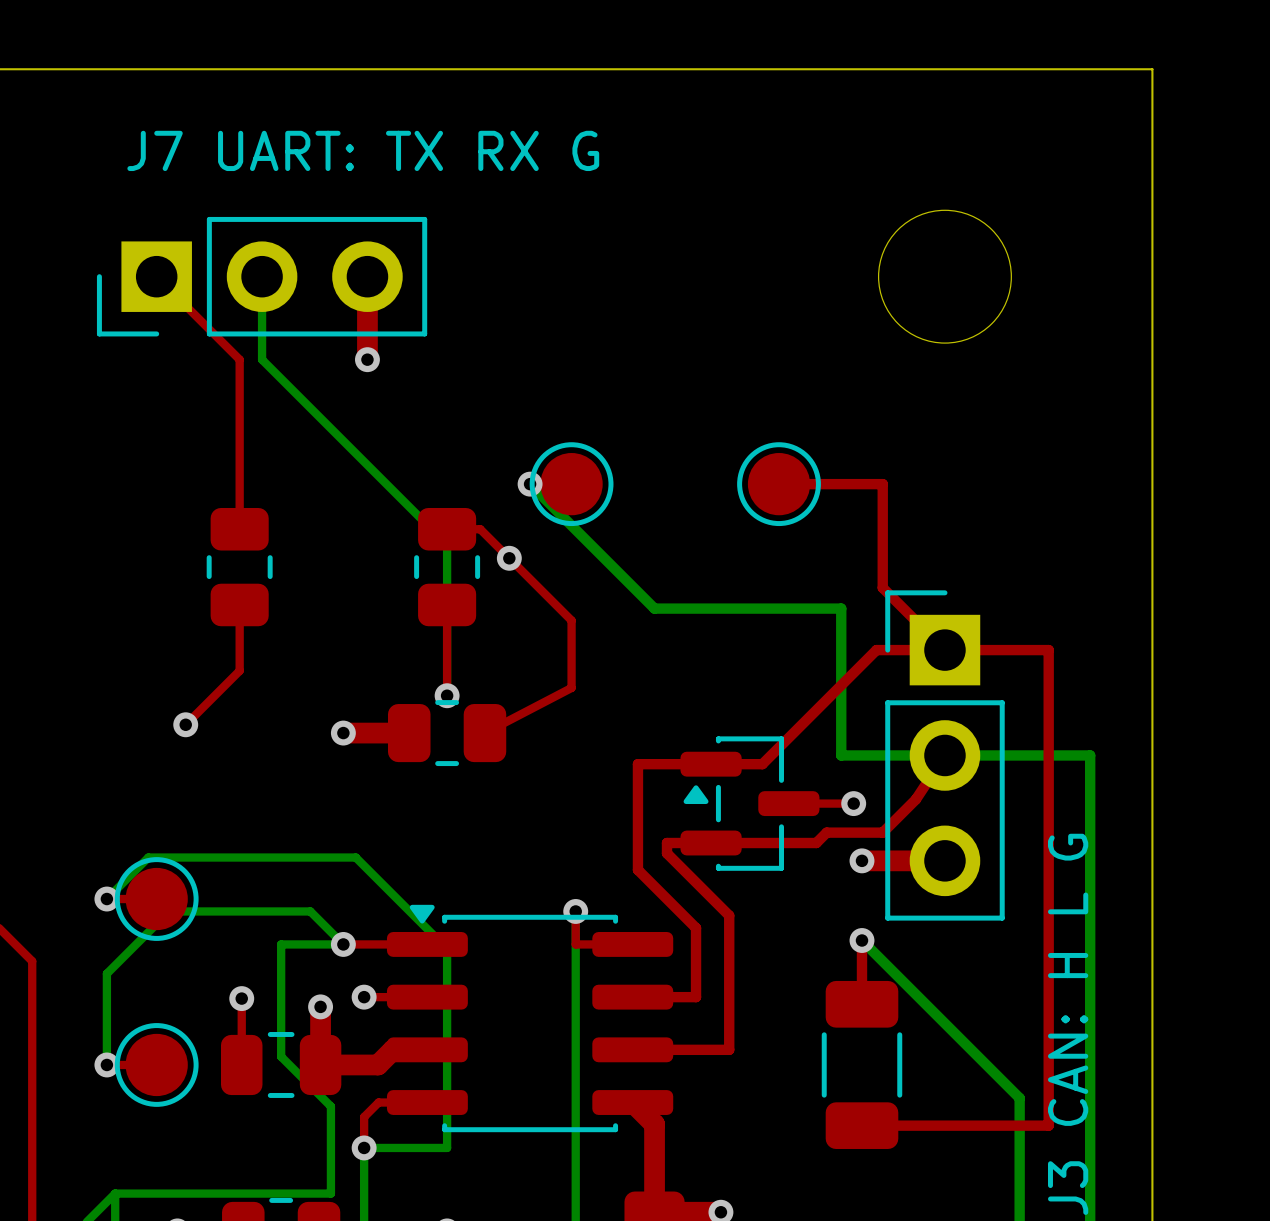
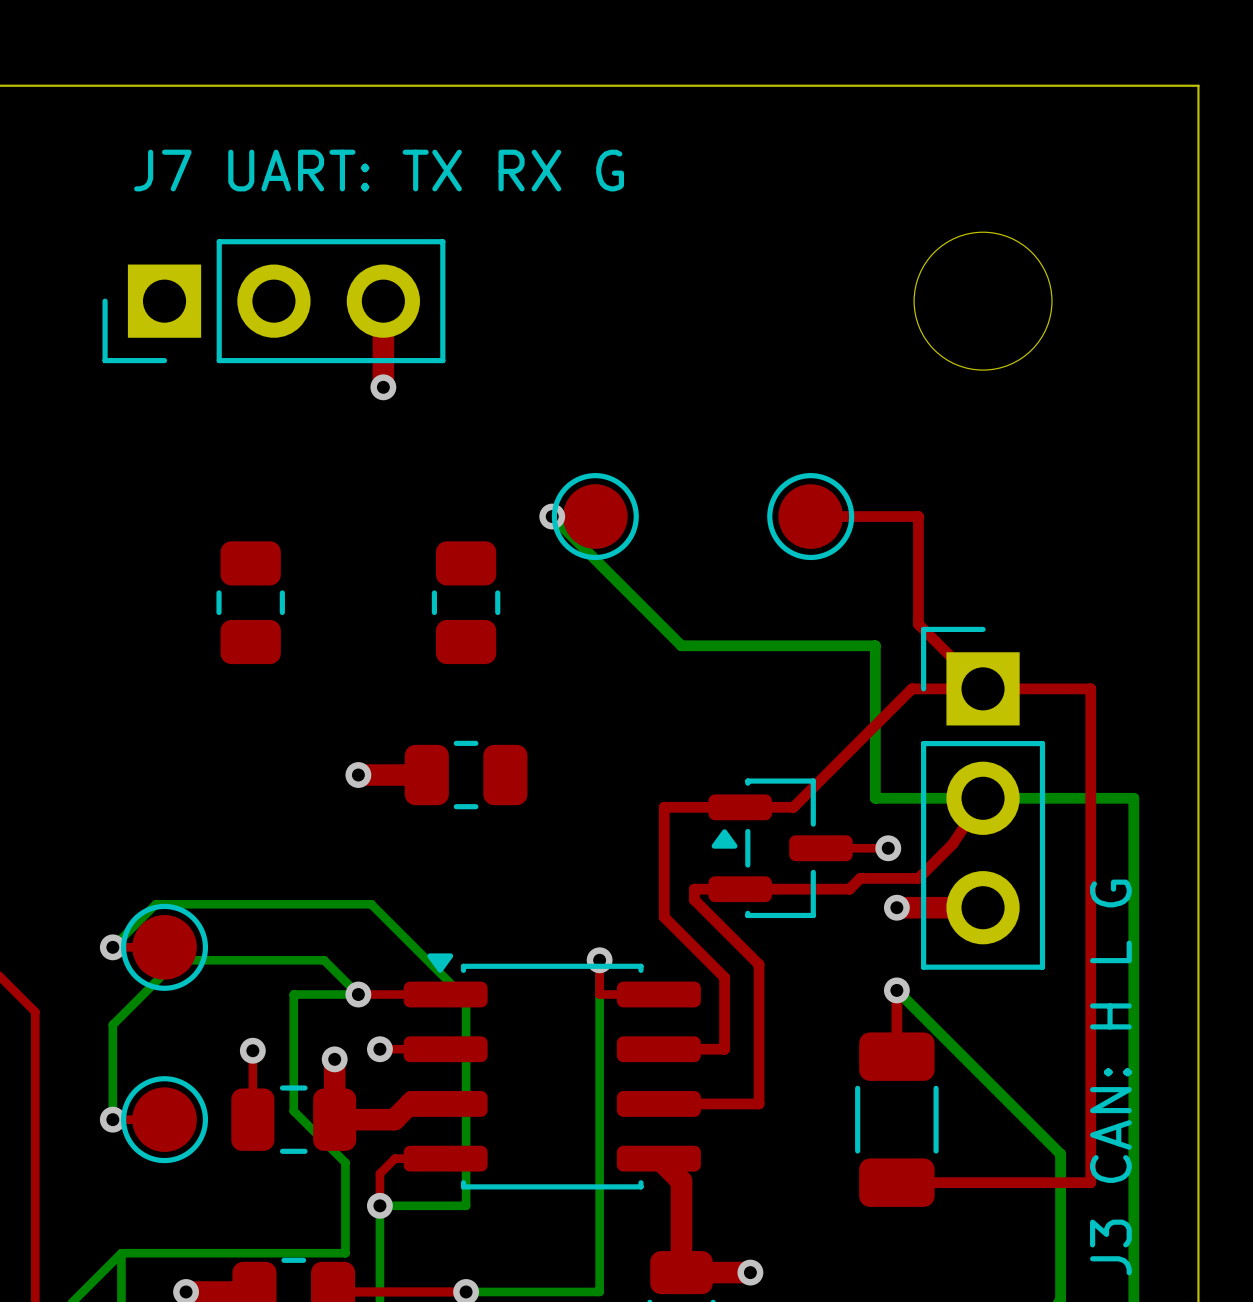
top track: (156, 276) (239, 359) (239, 529) -> none
bottom track: (262, 276) (262, 359) (447, 544) (447, 695) -> none
top track: (447, 529) (480, 529) (571, 620) (571, 687) (484, 733) -> none
via: (509, 558) -> none
top track: (239, 604) (239, 670) (185, 724) -> none
top track: (447, 604) (447, 695) -> none
via: (447, 695) -> none
via: (185, 724) -> none

